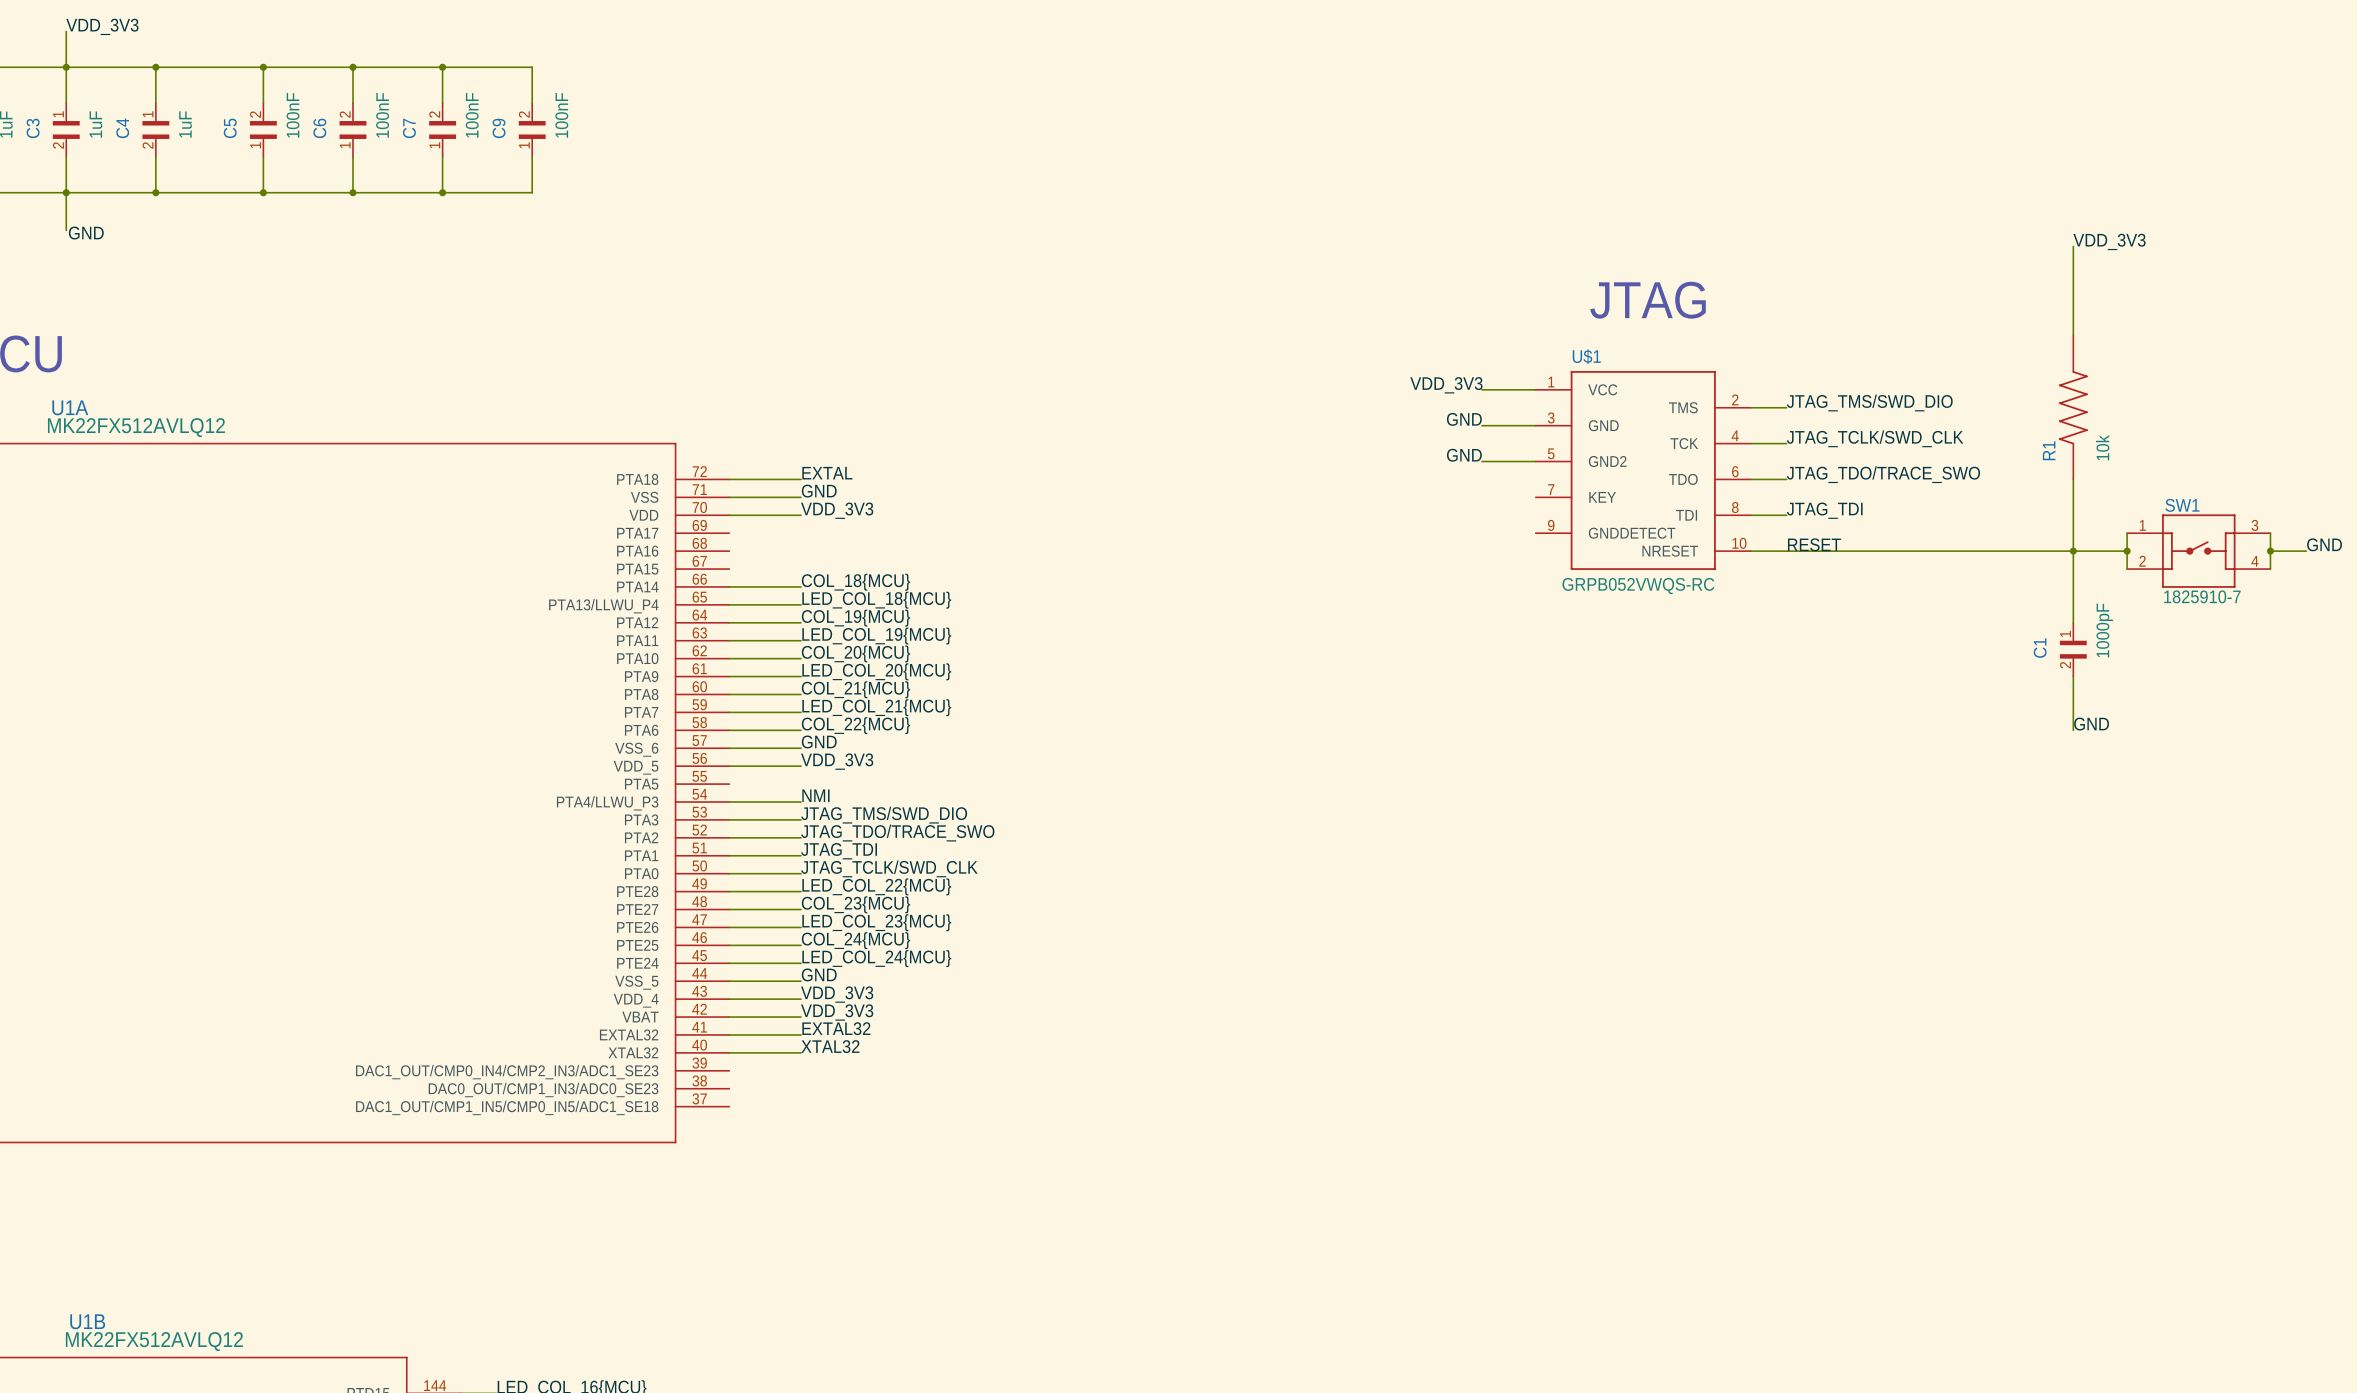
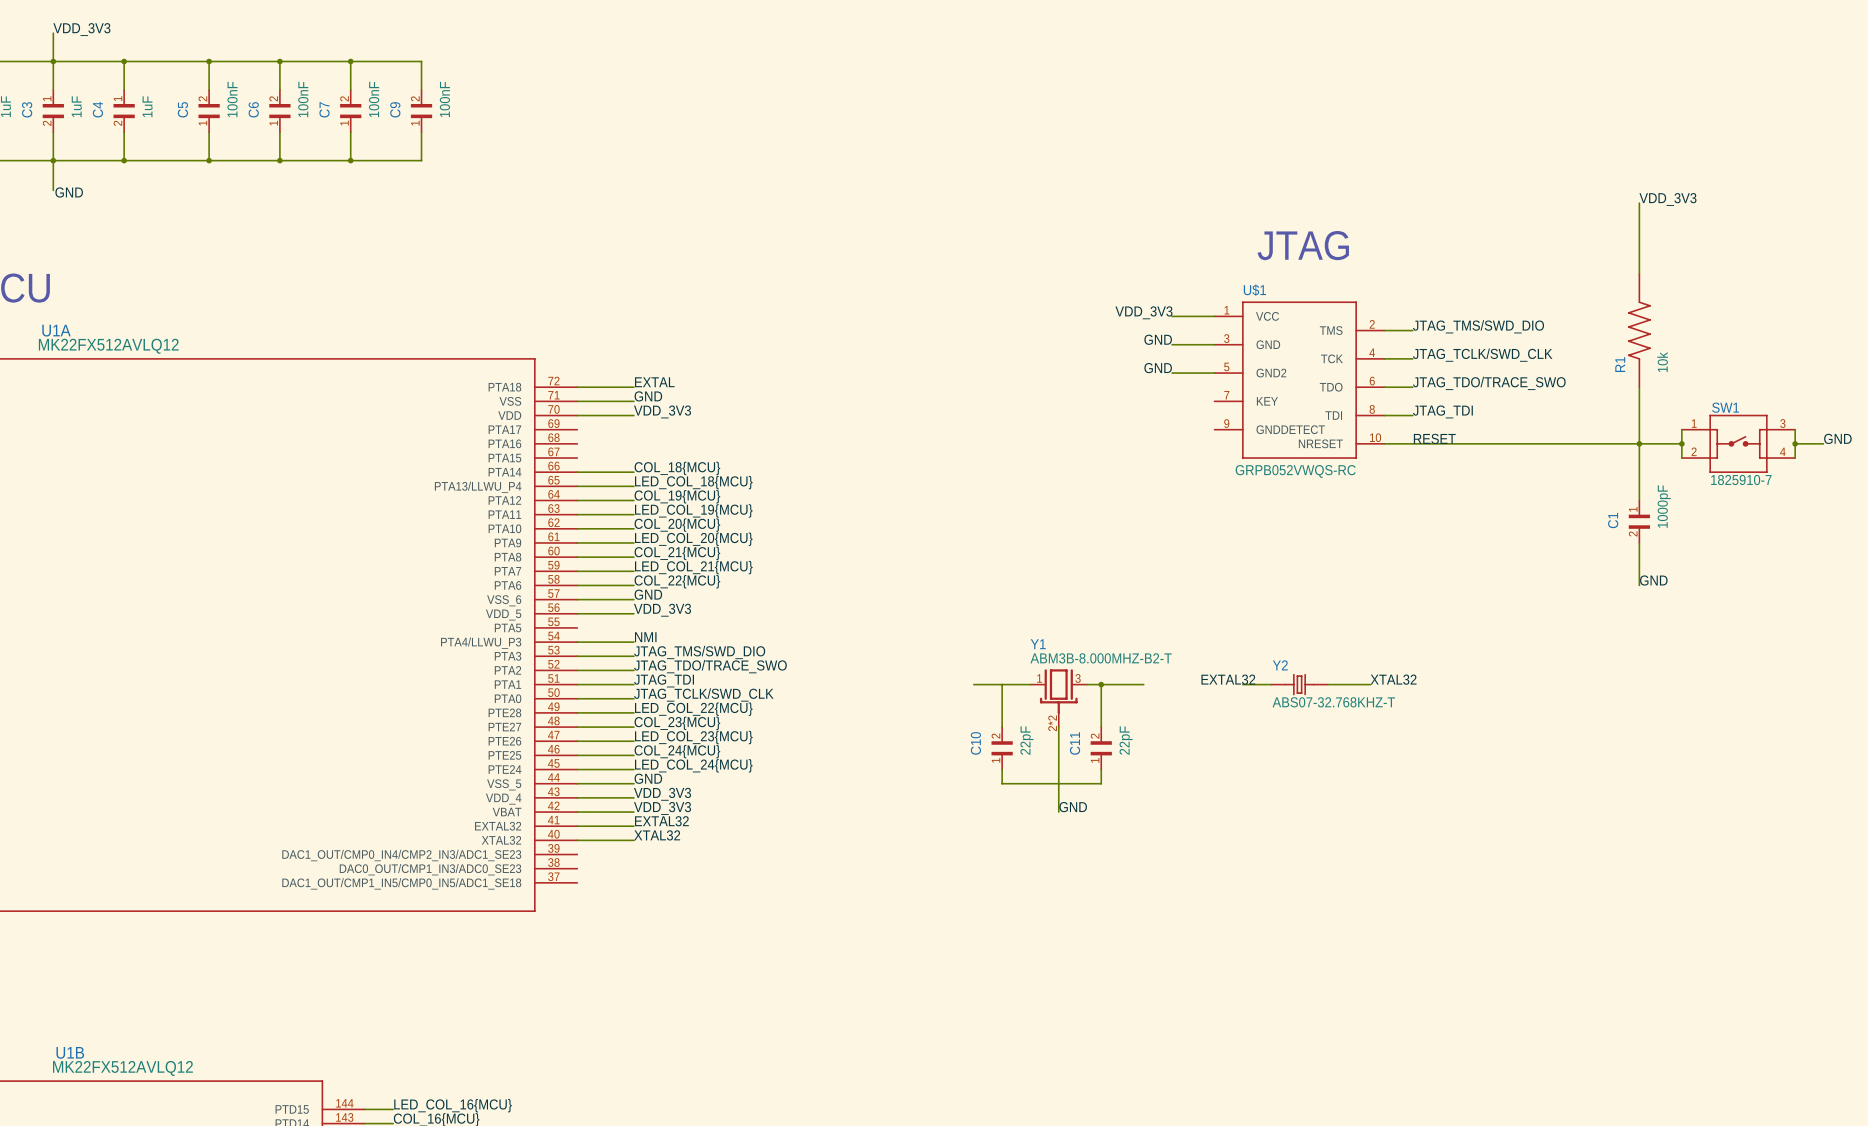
label: none -> EXTAL32 (1228, 679)
label: none -> XTAL32 (1393, 679)
wire: none -> (973, 684) (1030, 684)
wire: none -> (1002, 684) (1002, 727)
wire: none -> (1087, 684) (1143, 684)
wire: none -> (1101, 684) (1101, 727)
junction: none -> (1101, 684)
wire: none -> (1242, 684) (1271, 684)
Y2: none -> ABS07-32.768KHZ-T (1299, 684)
wire: none -> (1327, 684) (1370, 684)
Y1: none -> ABM3B-8.000MHZ-B2-T (1058, 698)
wire: none -> (1058, 727) (1058, 812)
C10: none -> 22pF (1002, 748)
C11: none -> 22pF (1101, 748)
wire: none -> (1002, 769) (1002, 783) (1101, 783) (1101, 769)
label: none -> GND (1073, 807)

